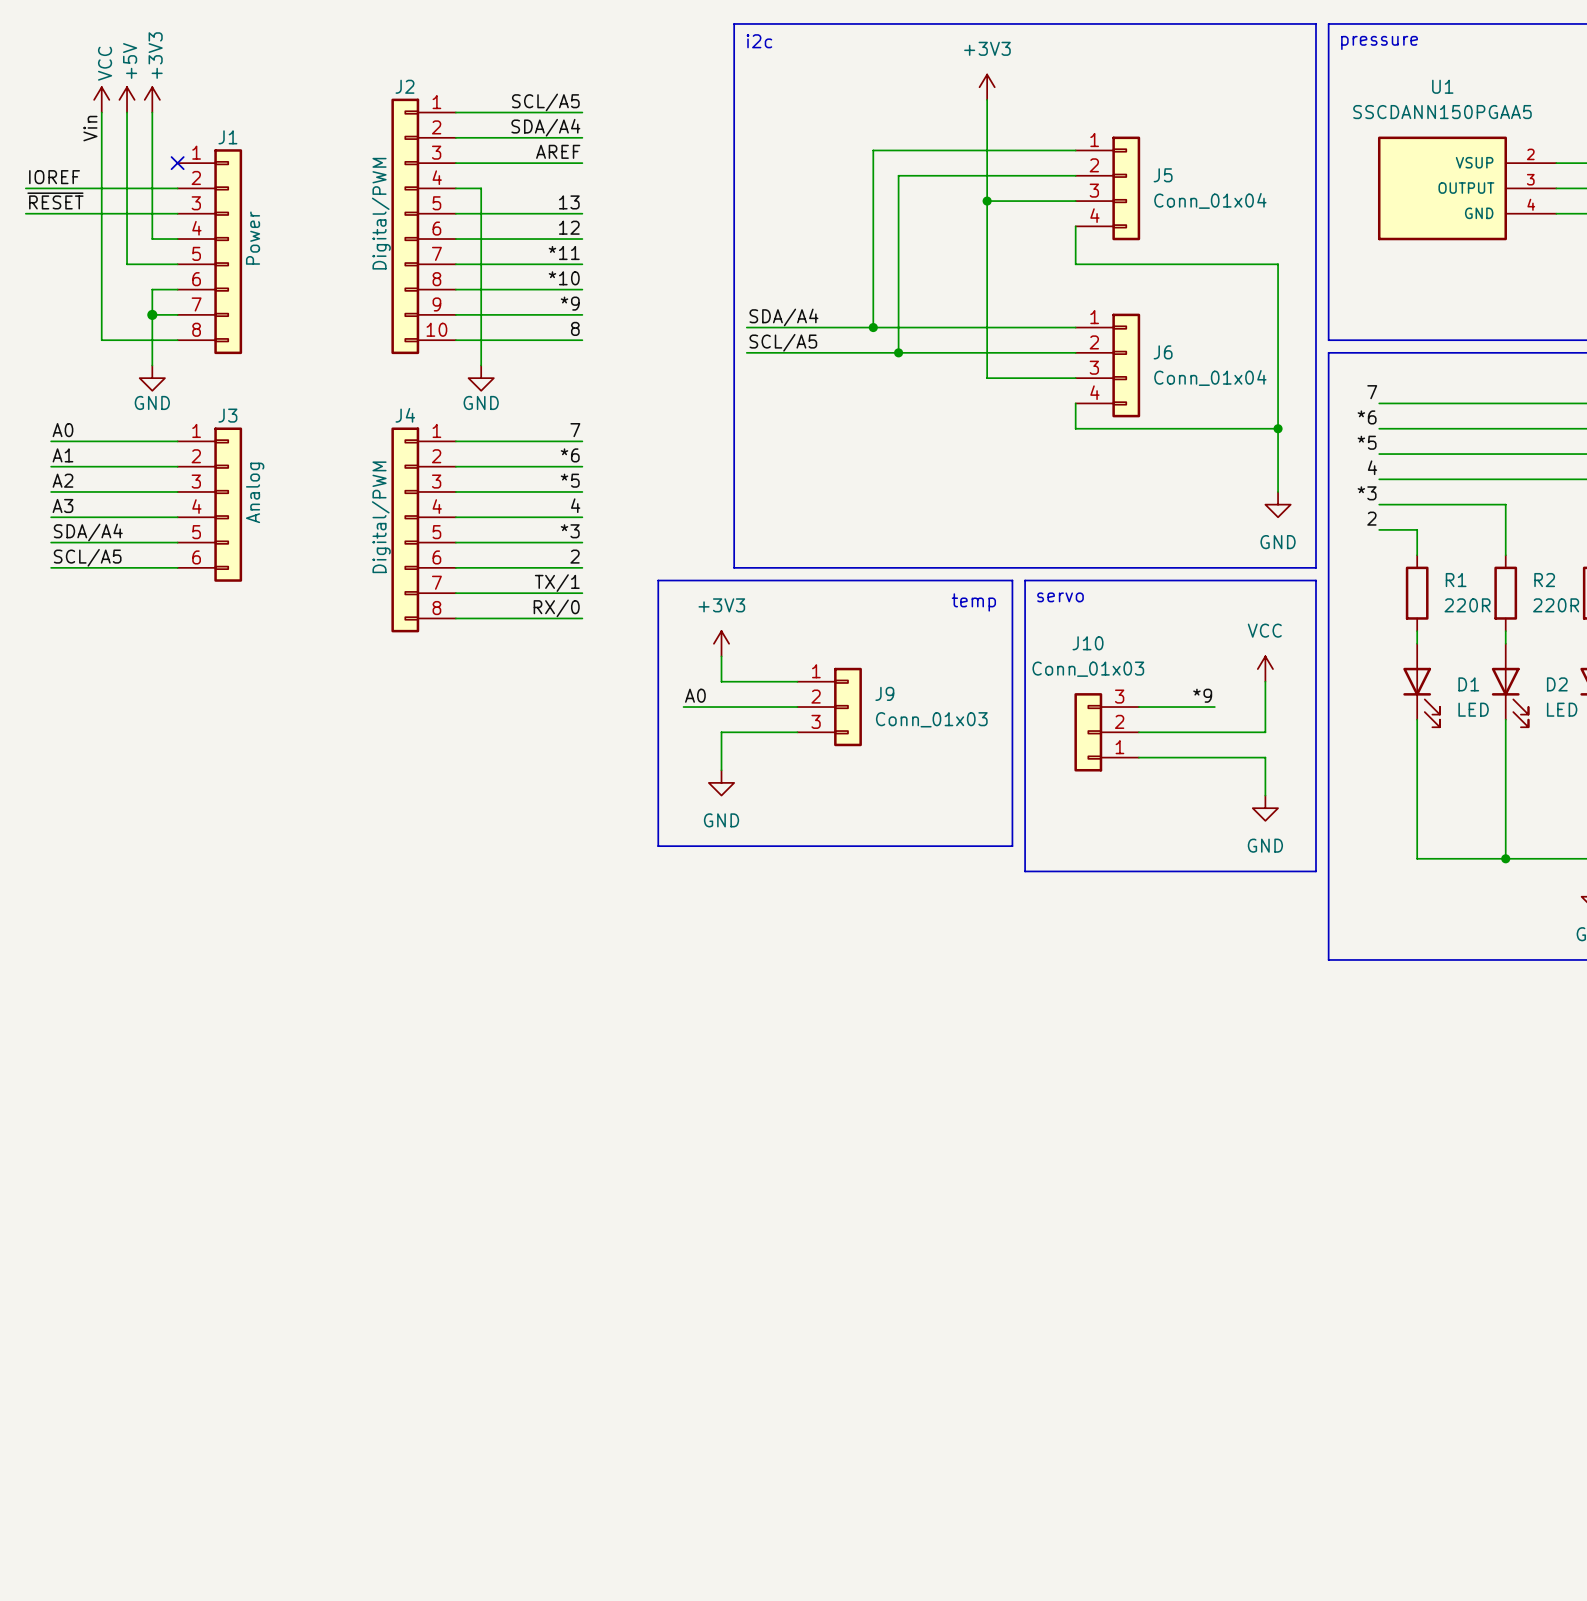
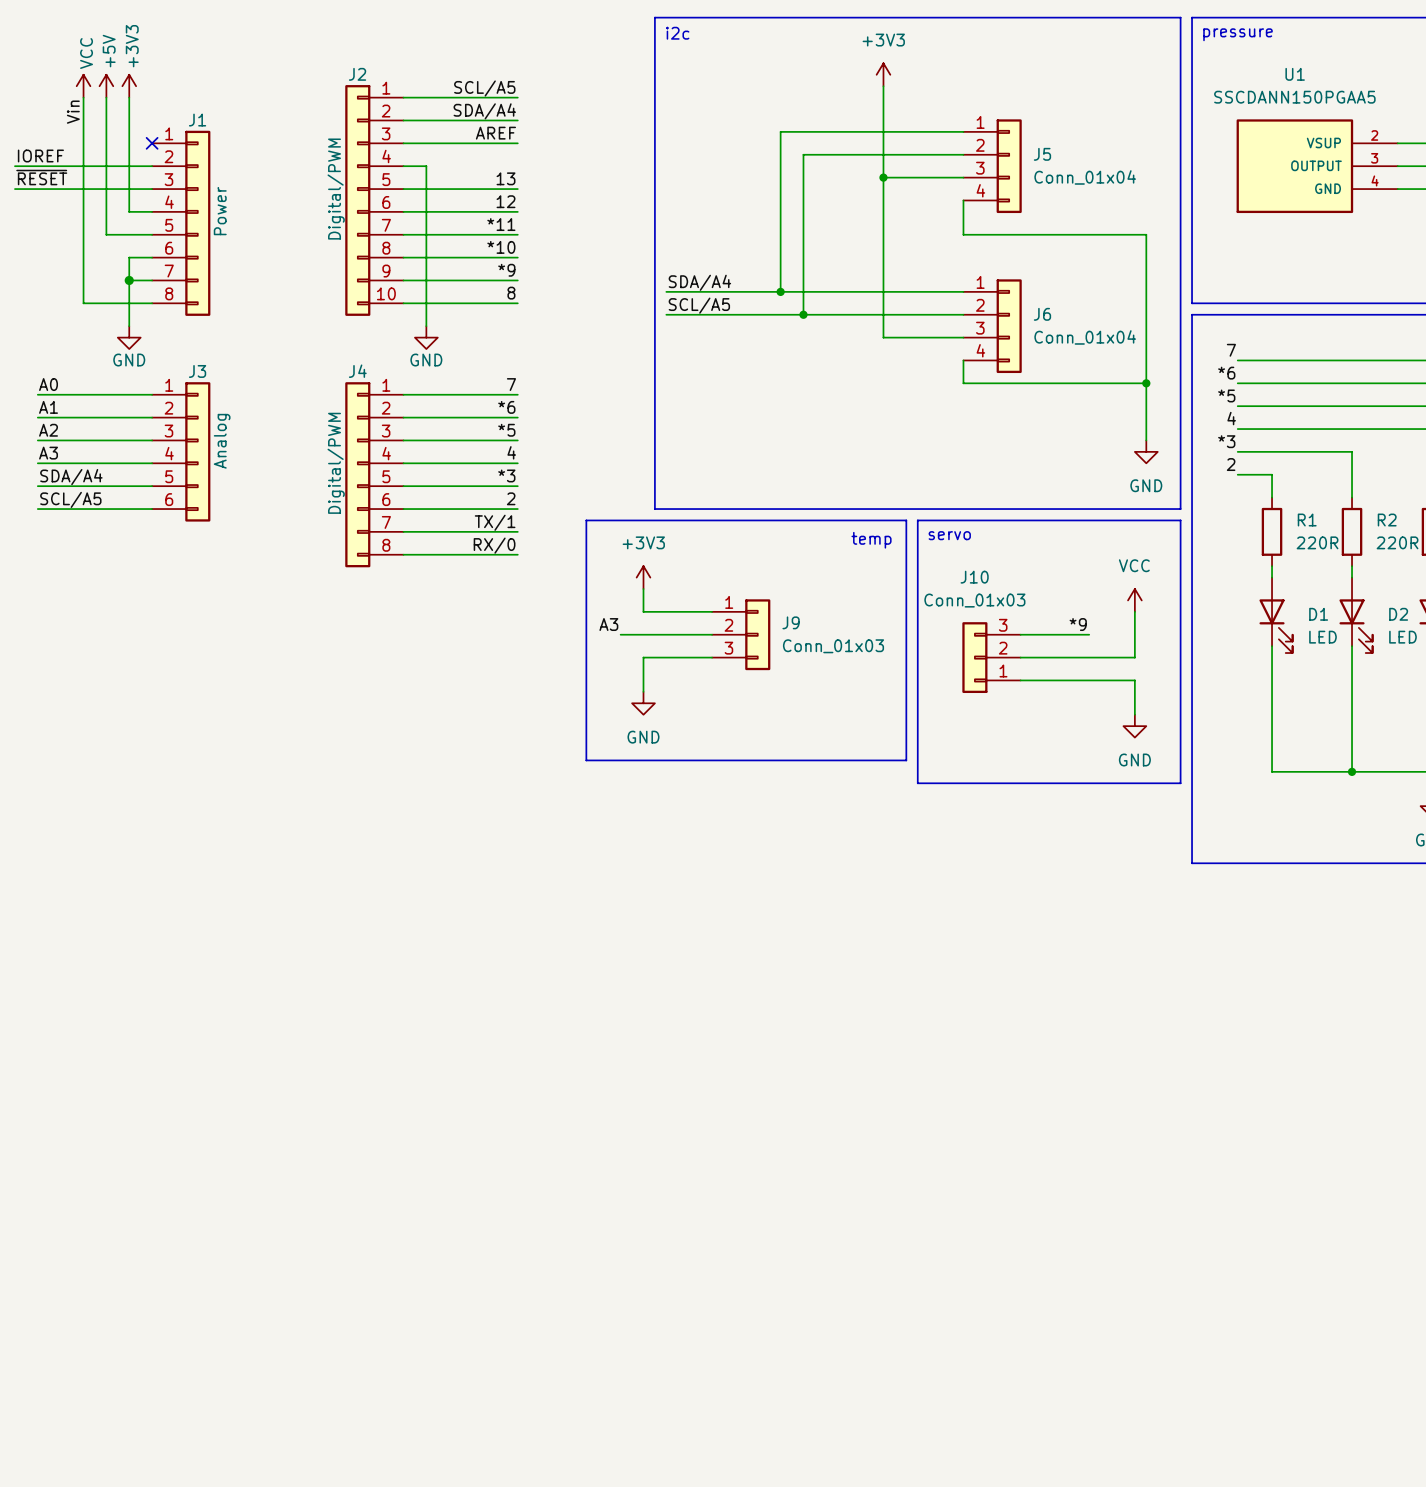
label: none -> A3 (608, 624)
label: A0 (695, 695) -> none
wire: (683, 707) (696, 707) -> none

